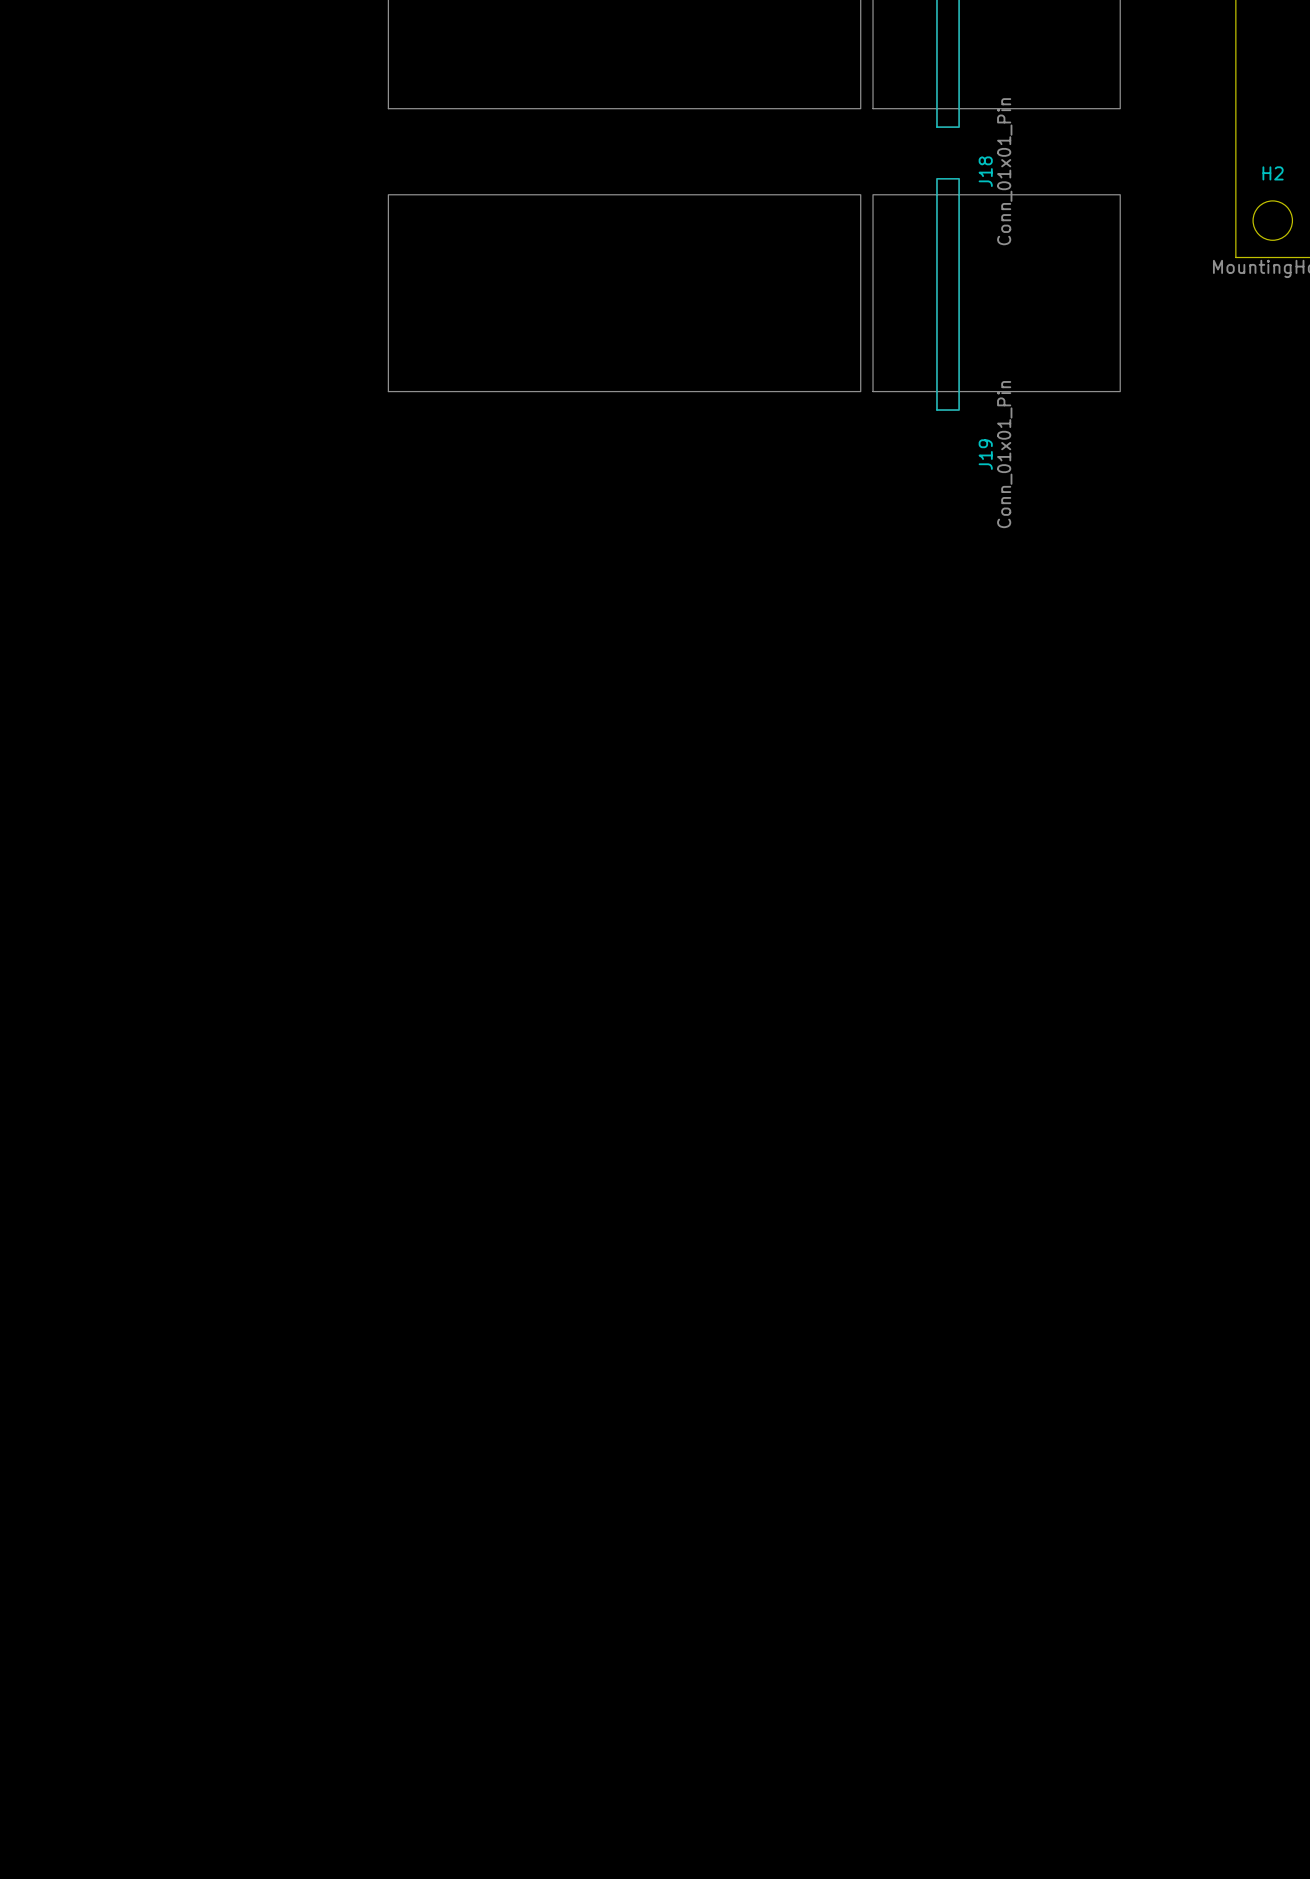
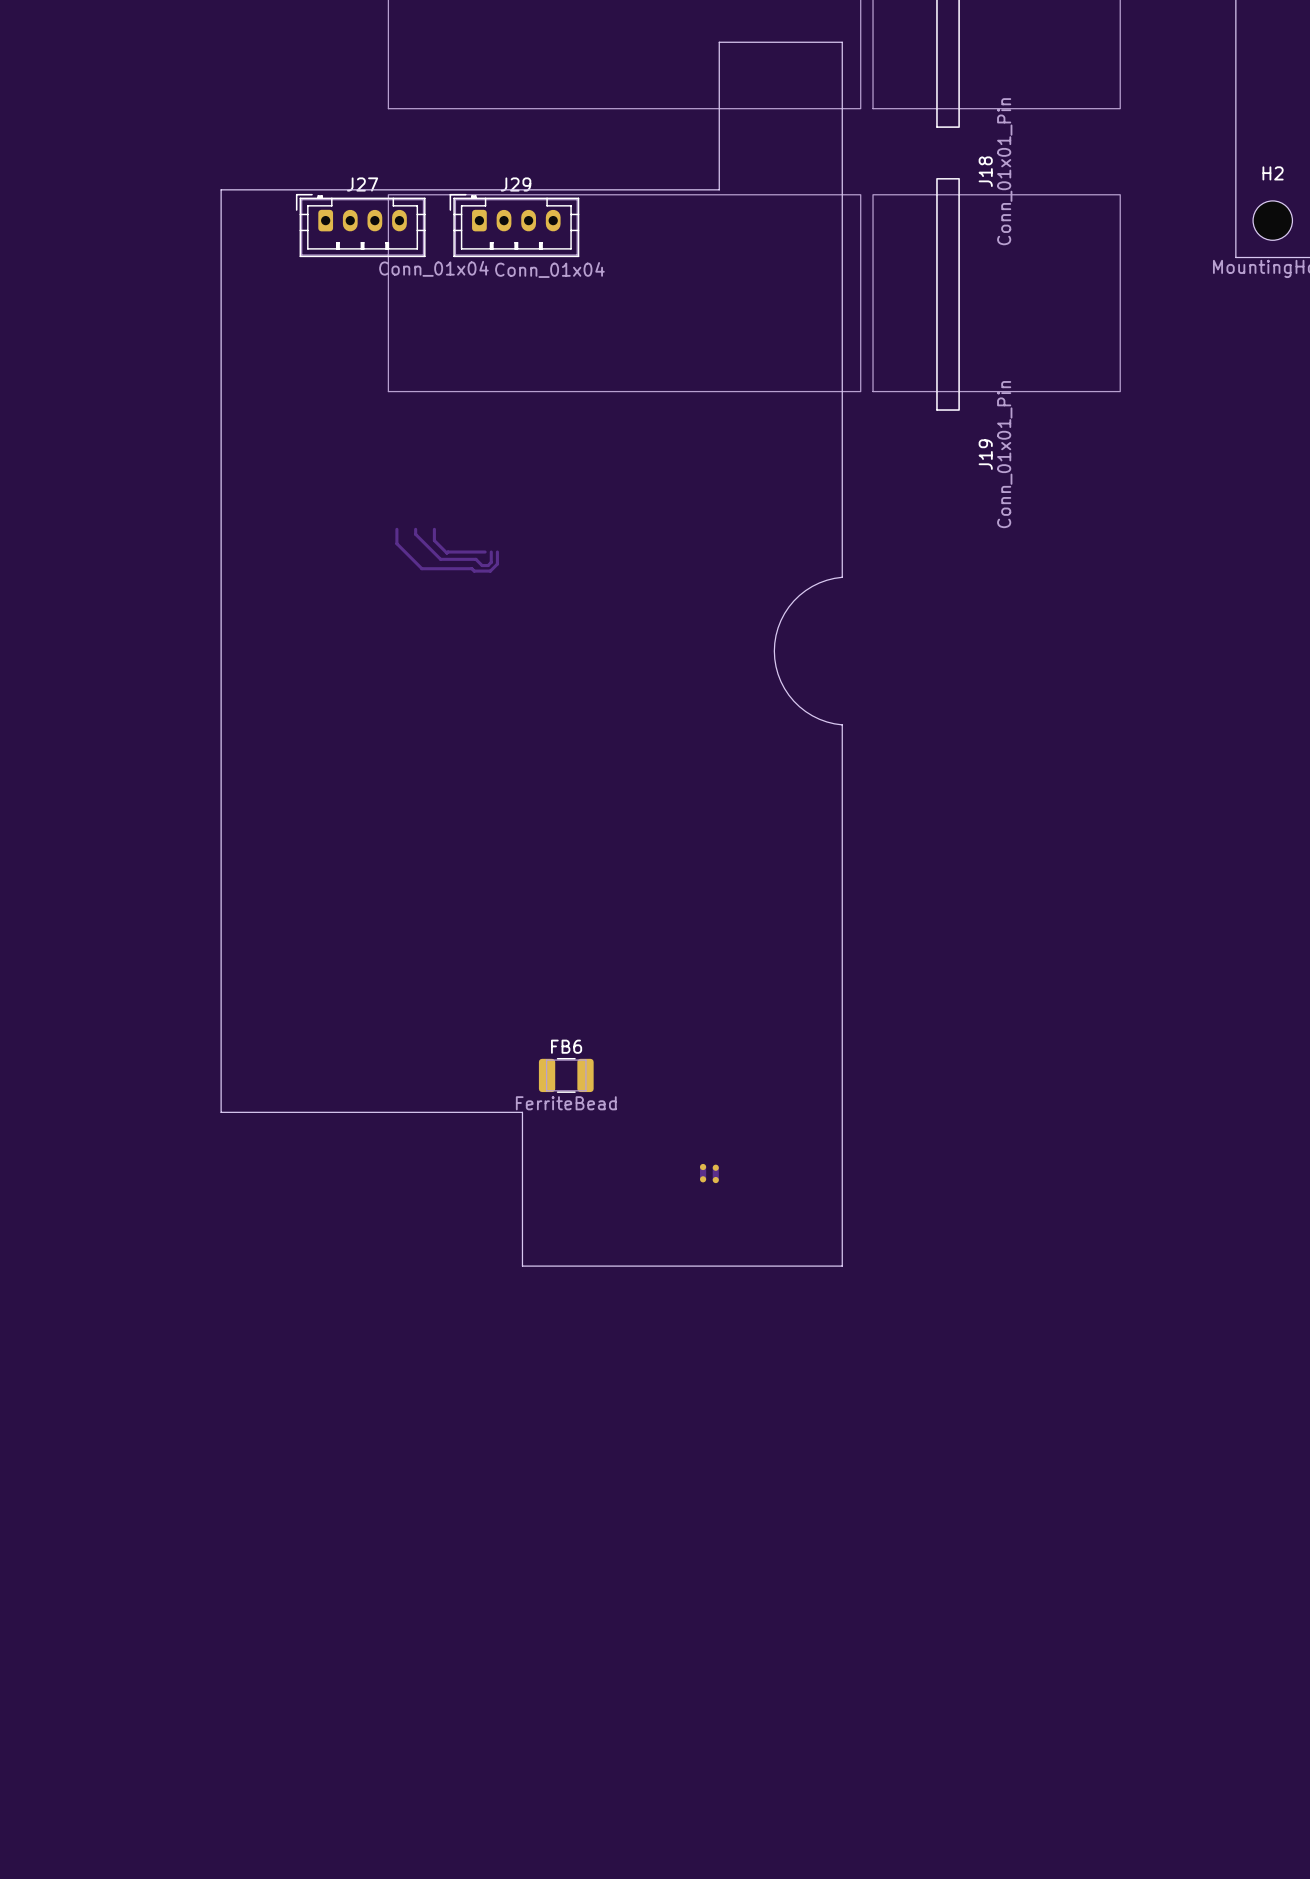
board edge: none -> (719, 42) (719, 189) (221, 189) (221, 1112) (522, 1112) (522, 1266) (842, 1266) (842, 724) (826, 721) (812, 715) (793, 701) (780, 681) (776, 666) (774, 651) (776, 635) (780, 620) (793, 600) (812, 586) (826, 580) (842, 577) (842, 42) (719, 42)
J27: none -> Conn_01x04 (360, 225)
J29: none -> Conn_01x04 (514, 225)
track: none -> (396, 529) (396, 543) (421, 568) (471, 568) (474, 571) (490, 571) (497, 564) (497, 552)
track: none -> (415, 529) (415, 534) (440, 559) (475, 559) (482, 565) (488, 565) (491, 562) (491, 552)
track: none -> (434, 529) (434, 540) (446, 553) (485, 552)
FB6: none -> FerriteBead (566, 1075)
part: none -> (703, 1173)
part: none -> (715, 1173)

